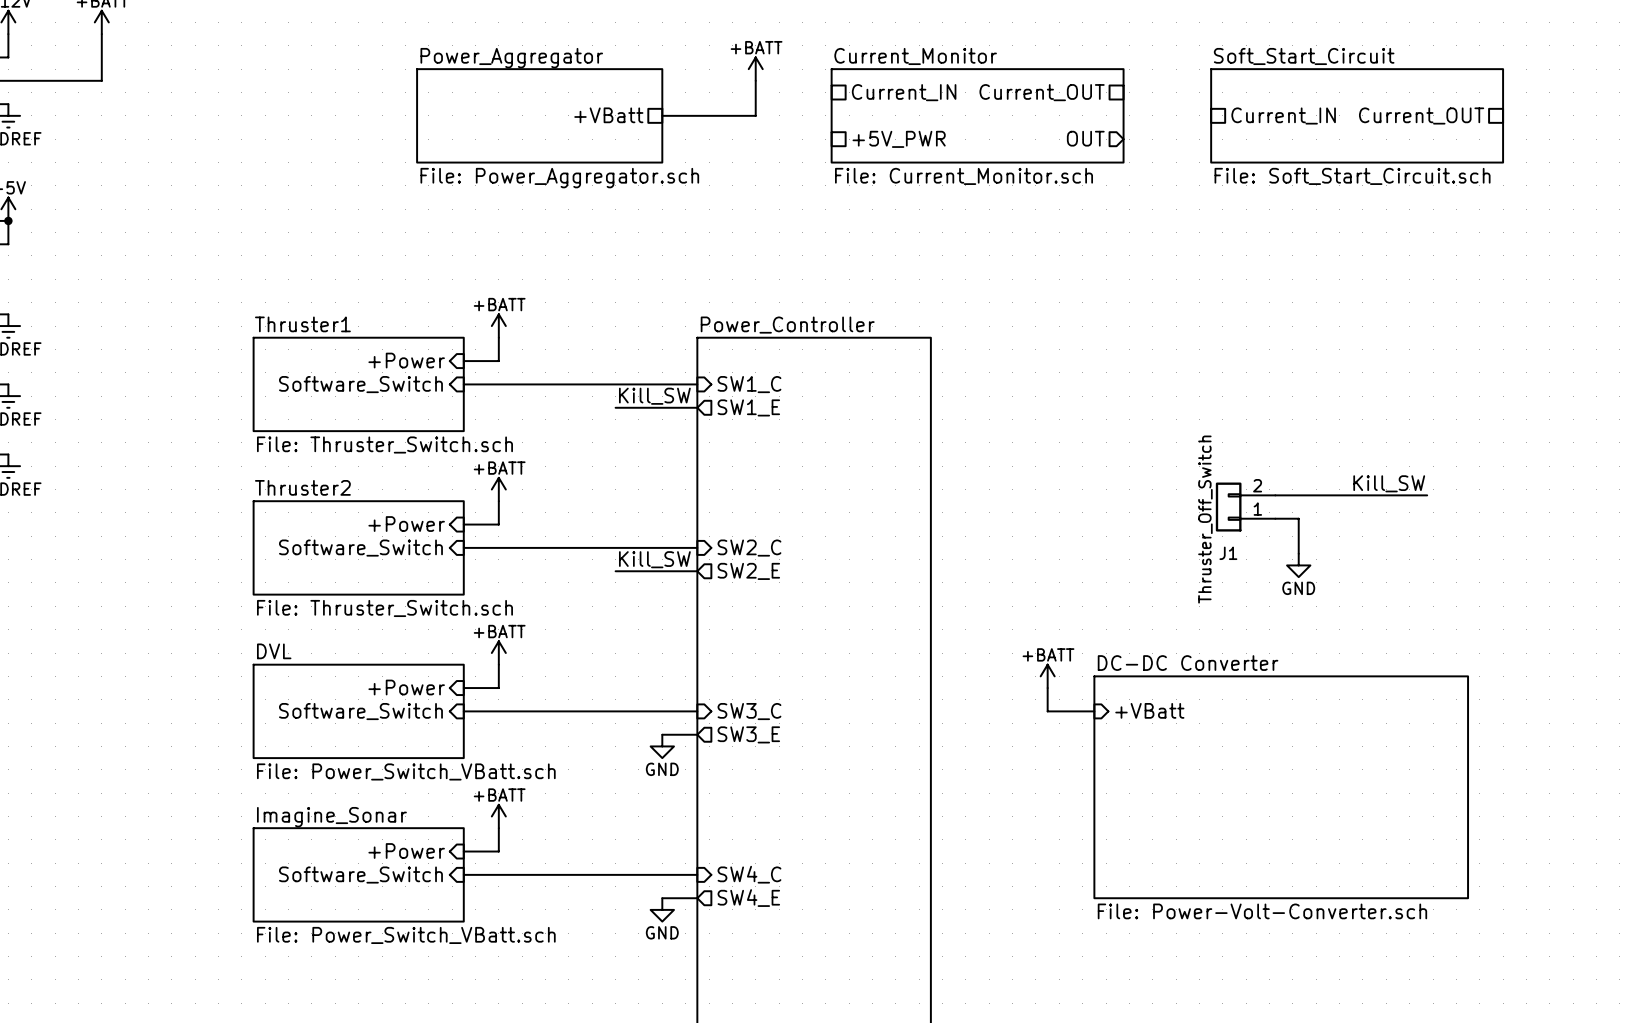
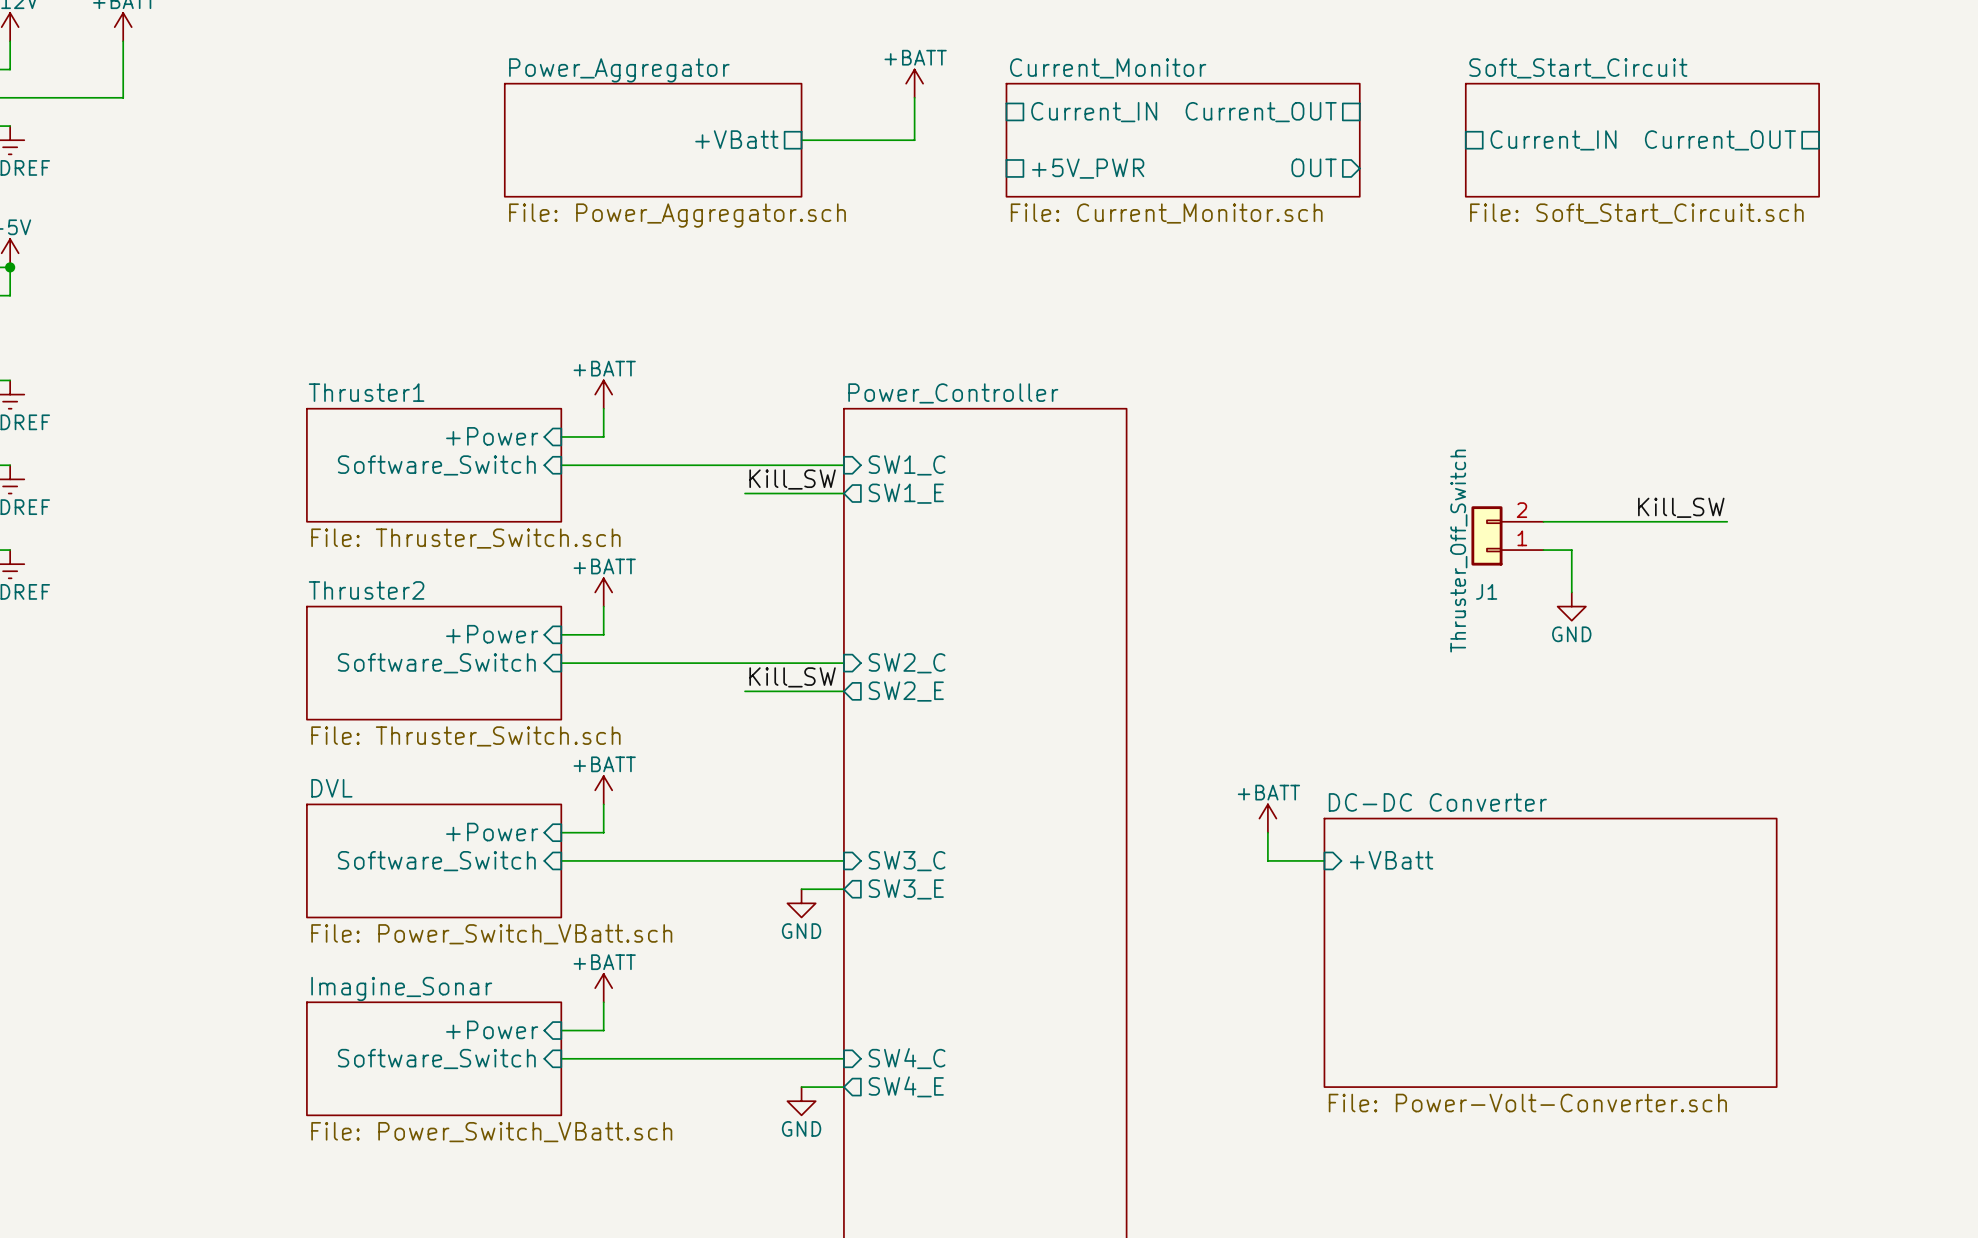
label position: Kill_SW (1389, 483) -> Kill_SW (1681, 507)
wire: (1275, 495) (1427, 495) -> (1543, 521) (1727, 521)
J1 position: (1245, 507) -> (1507, 535)
wire: (1275, 518) (1298, 518) (1298, 553) -> (1543, 550) (1571, 550) (1571, 592)
power symbol position: GND (1298, 565) -> GND (1571, 606)

